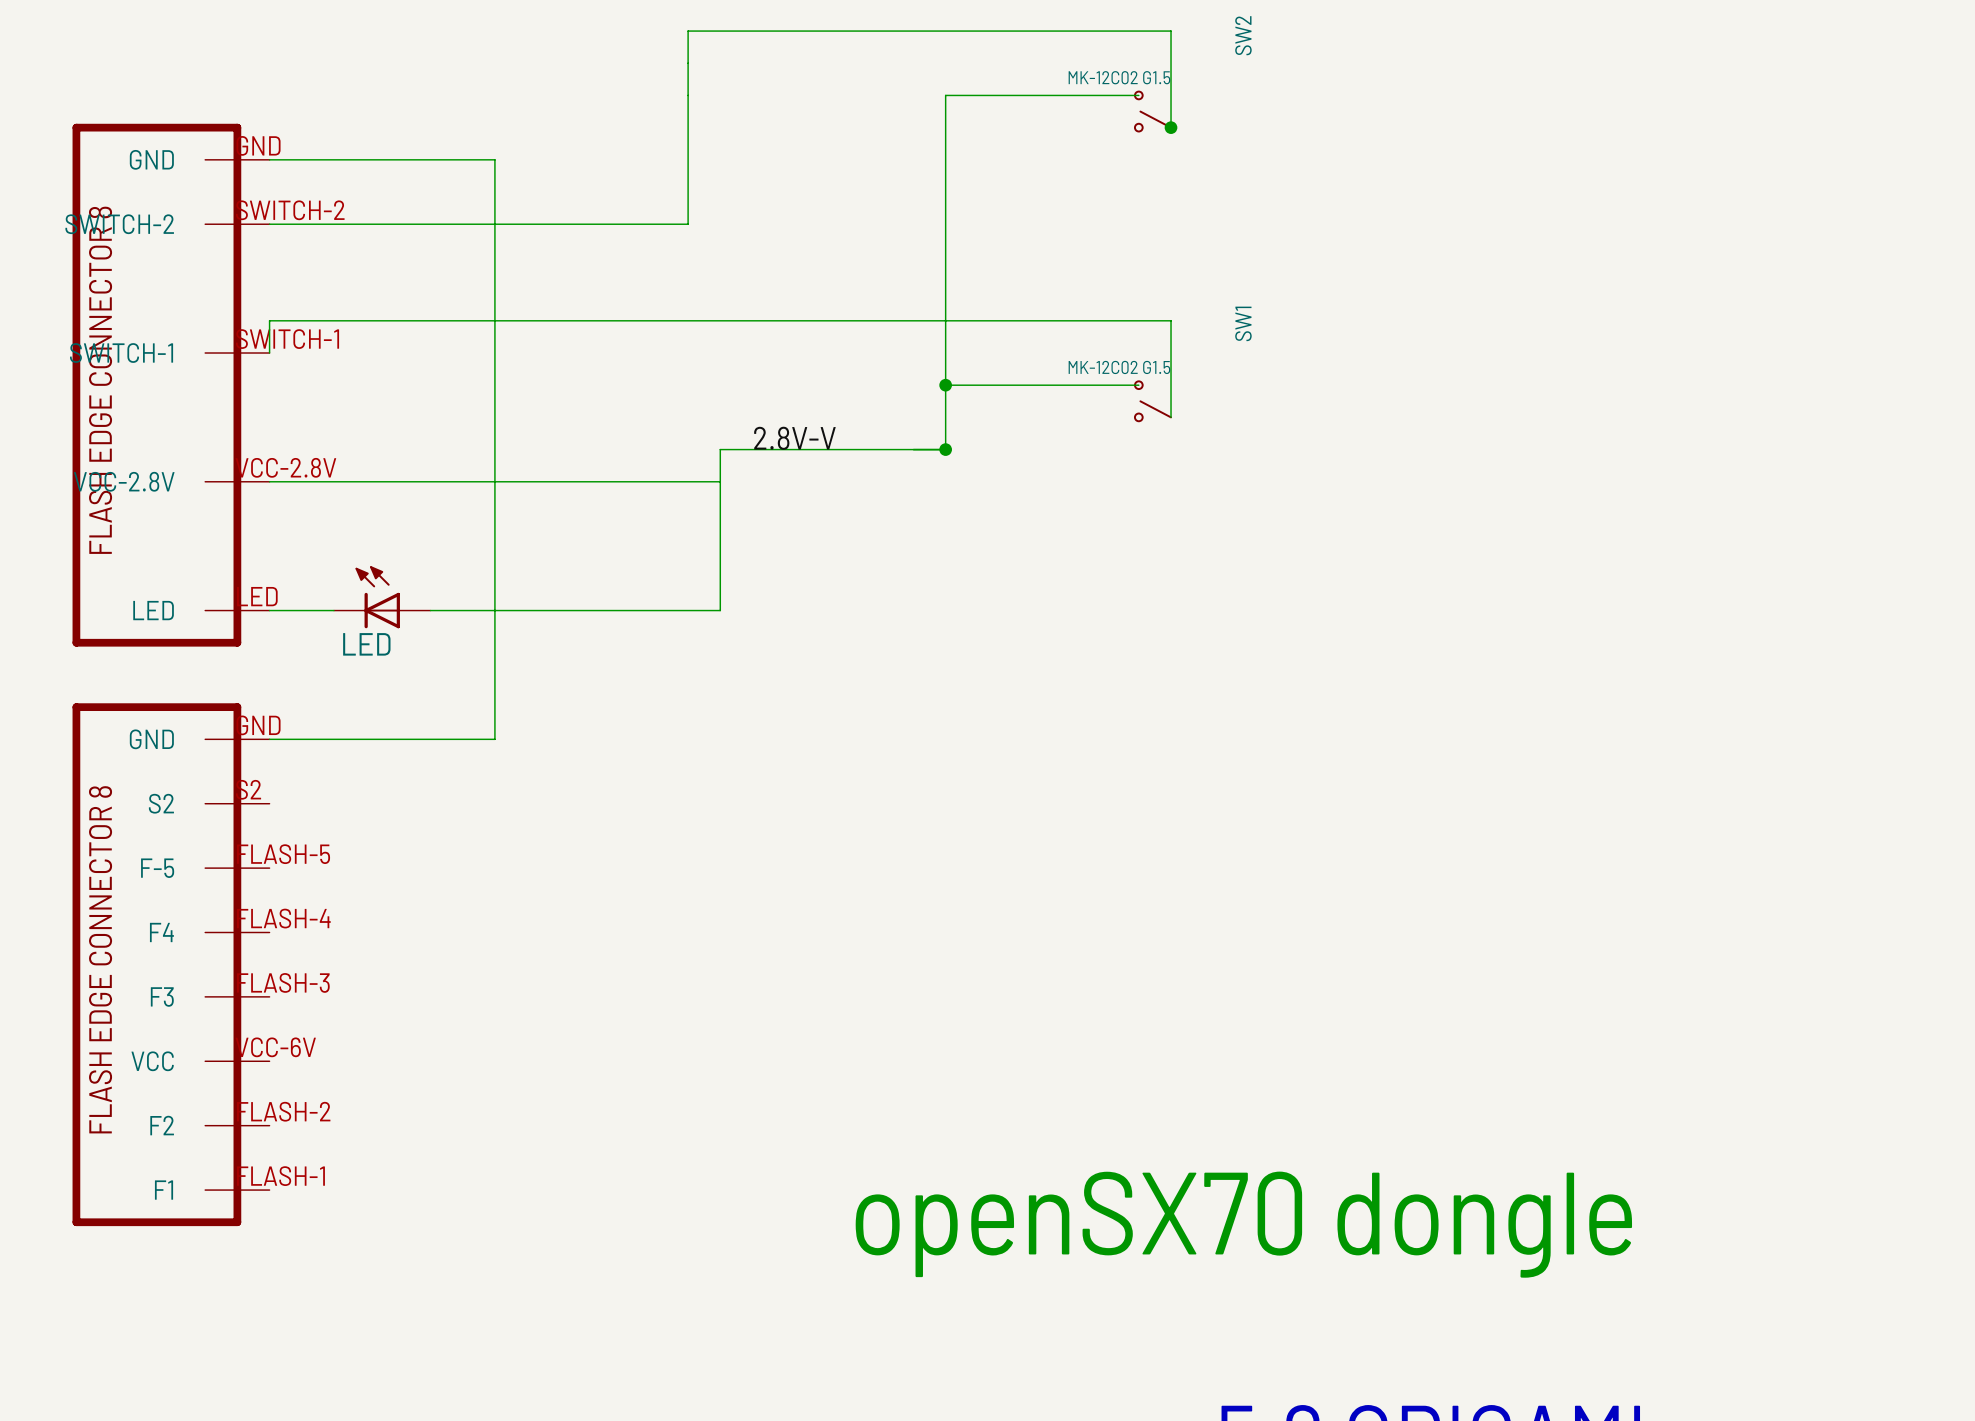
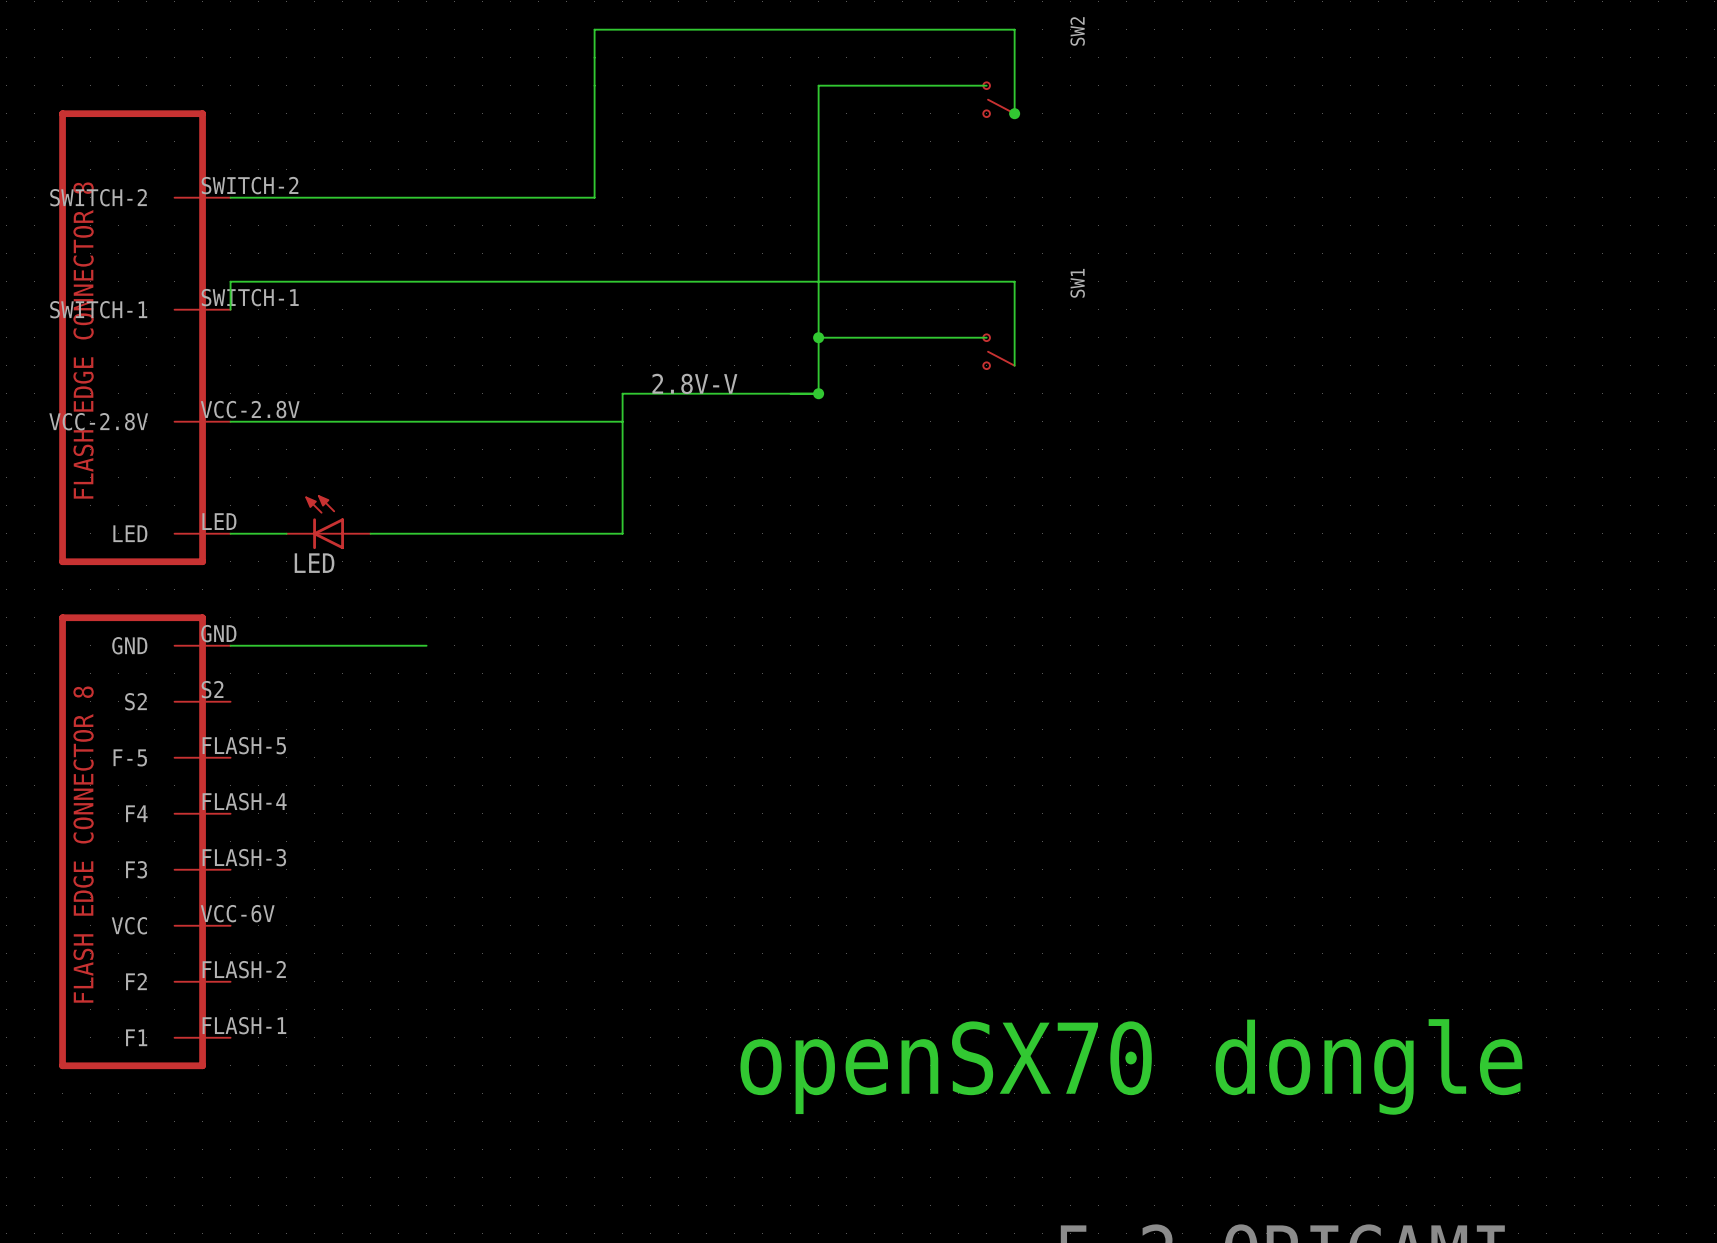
SW2 value: MK-12C02 G1.5 (1119, 77) -> none
part symbol: [72, 123, 270, 647] -> [59, 110, 231, 566]
wire: (269, 159) (494, 159) (494, 739) -> none
SW1 value: MK-12C02 G1.5 (1119, 367) -> none

